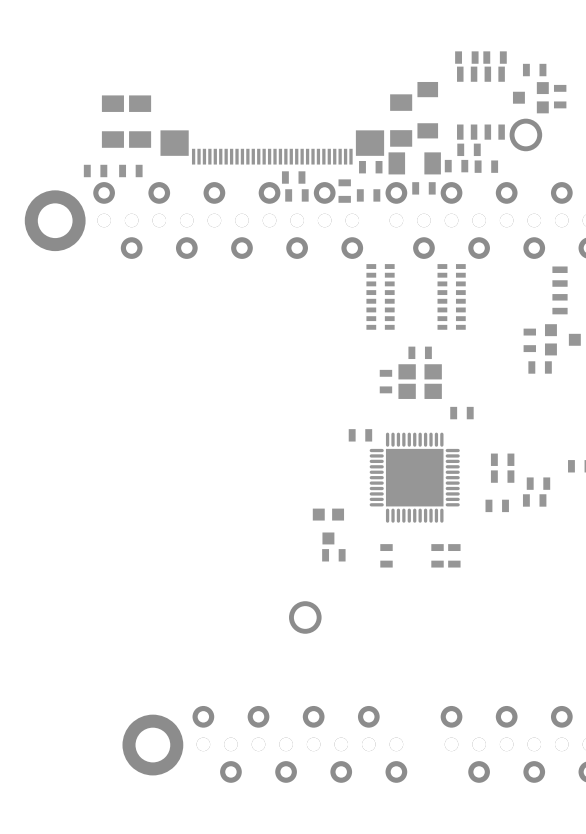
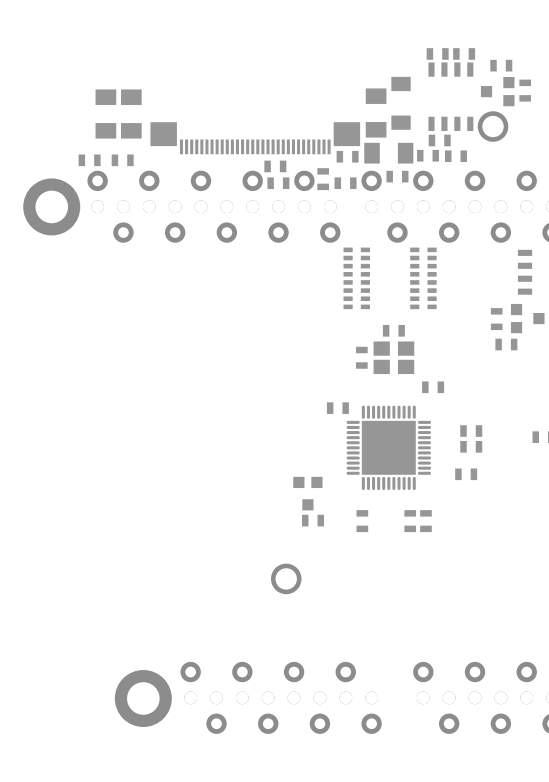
part: (538, 483) -> none
part: (534, 500) -> none

